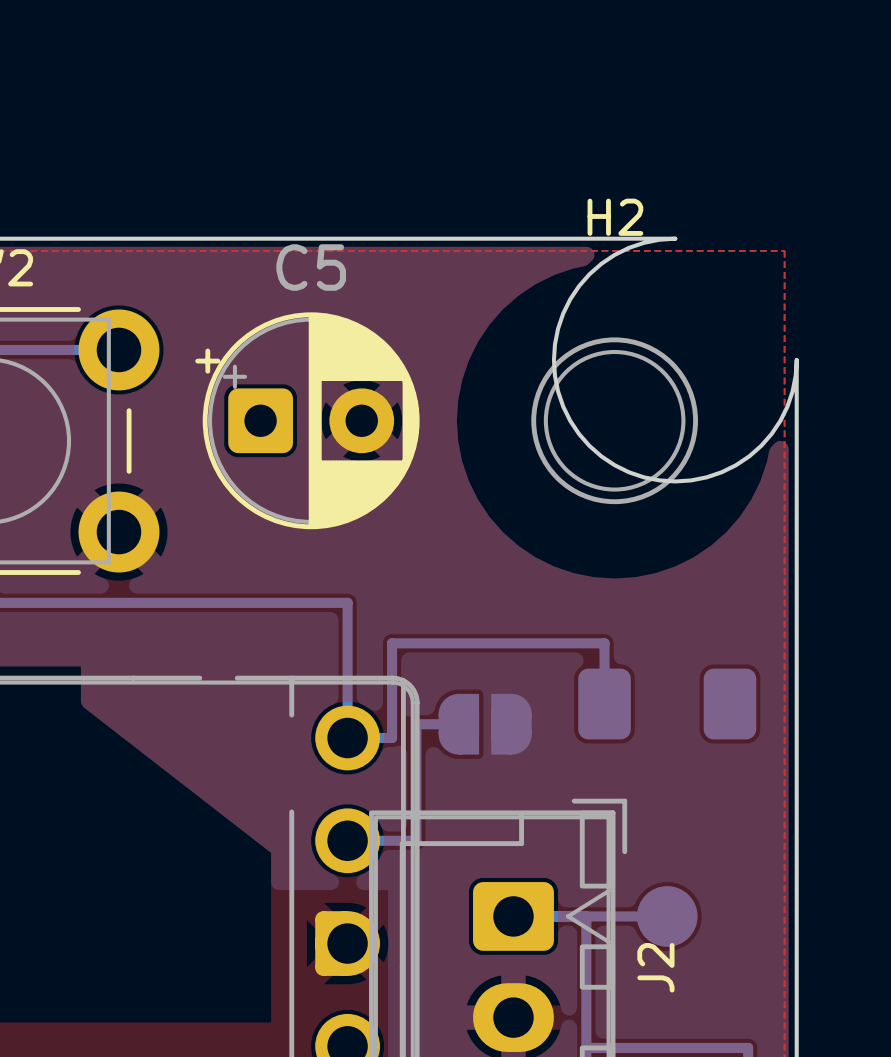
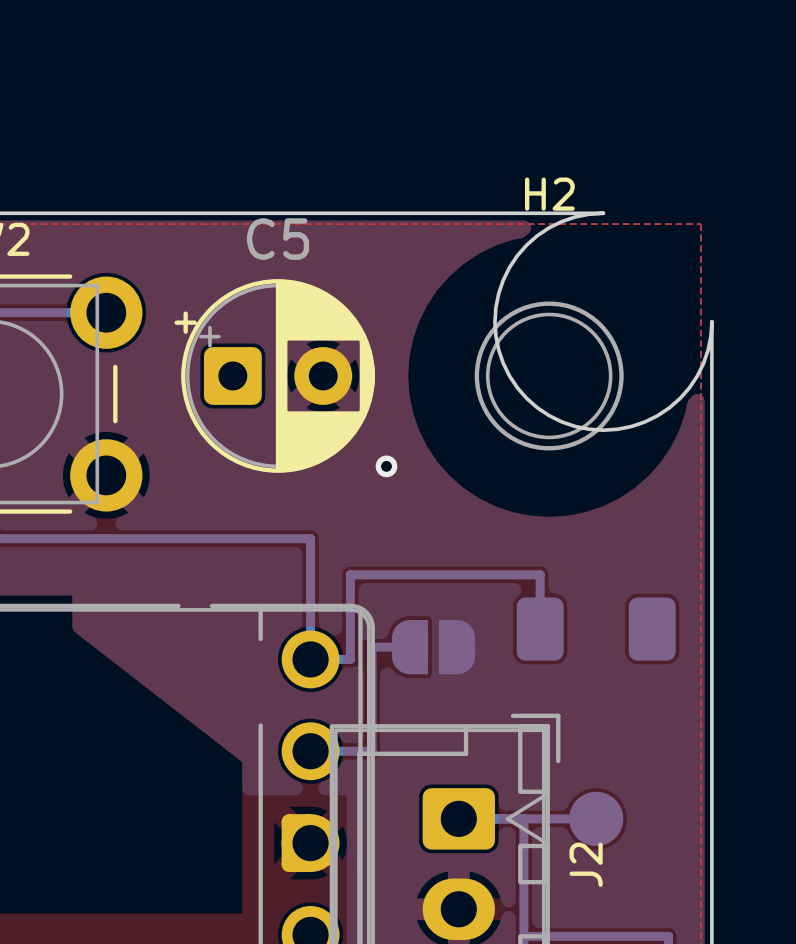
via: none -> (386, 466)

